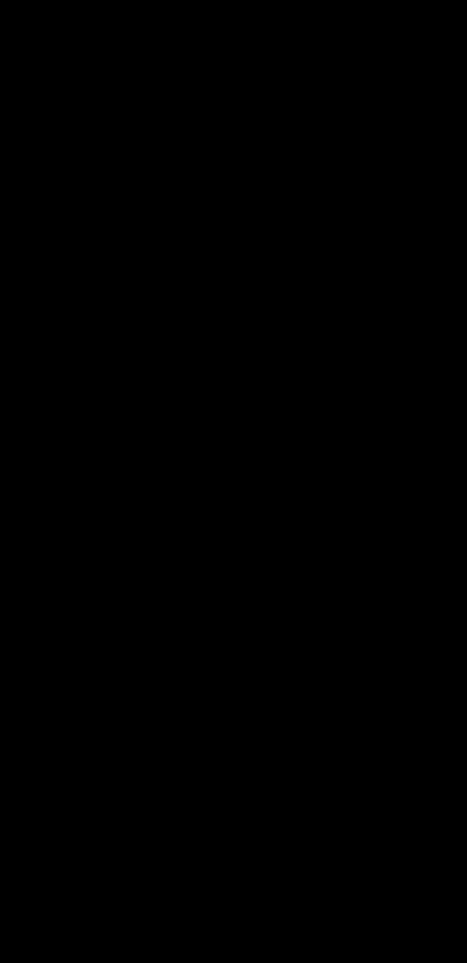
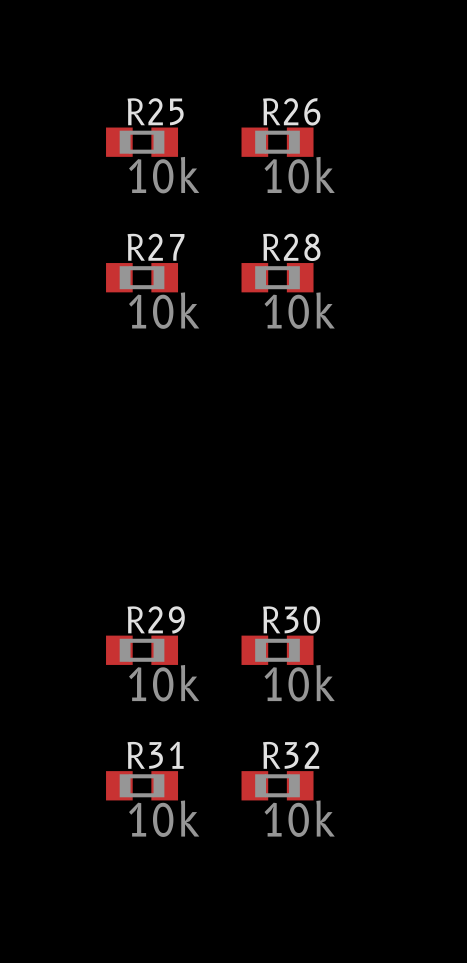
R25: none -> 10k (142, 142)
R26: none -> 10k (277, 142)
R27: none -> 10k (142, 277)
R28: none -> 10k (277, 277)
R29: none -> 10k (142, 650)
R30: none -> 10k (277, 650)
R31: none -> 10k (142, 785)
R32: none -> 10k (277, 785)

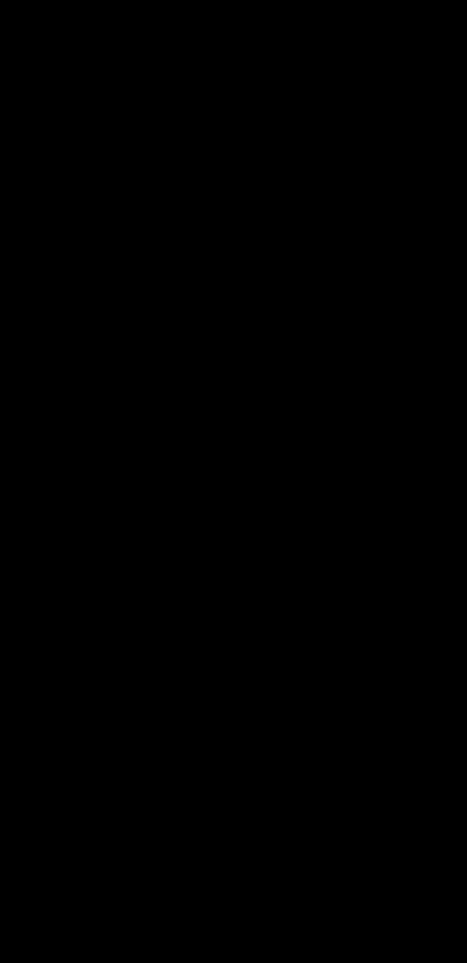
R25: 10k (142, 142) -> none
R26: 10k (277, 142) -> none
R27: 10k (142, 277) -> none
R28: 10k (277, 277) -> none
R29: 10k (142, 650) -> none
R30: 10k (277, 650) -> none
R31: 10k (142, 785) -> none
R32: 10k (277, 785) -> none

